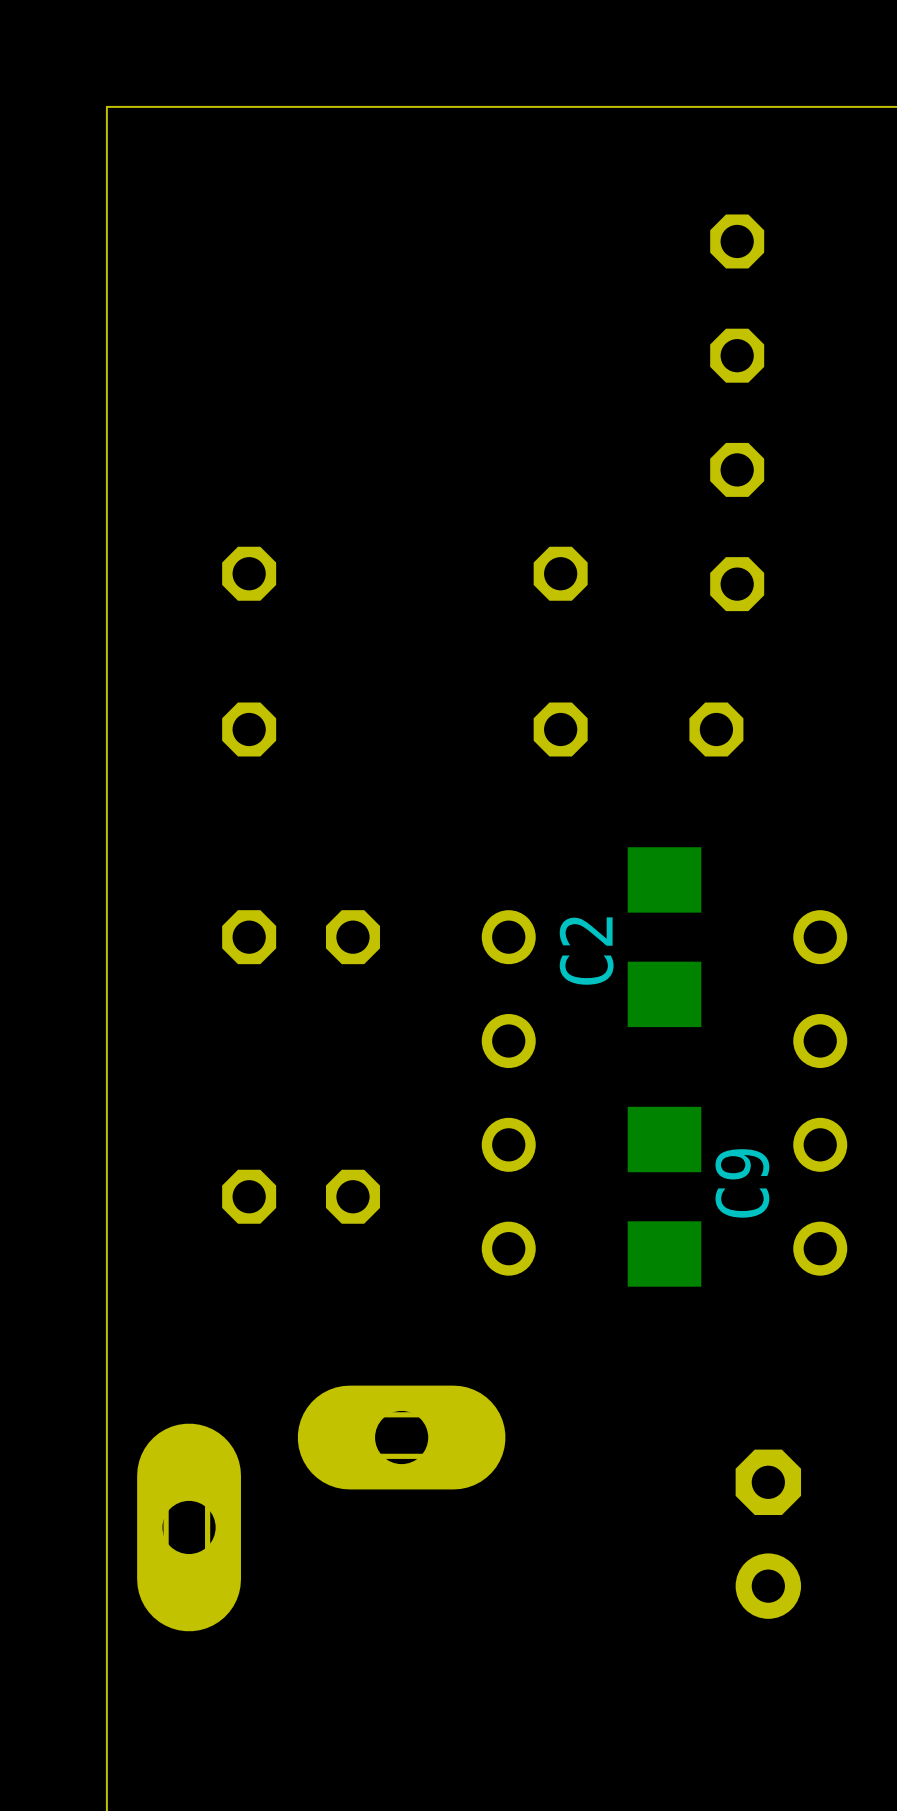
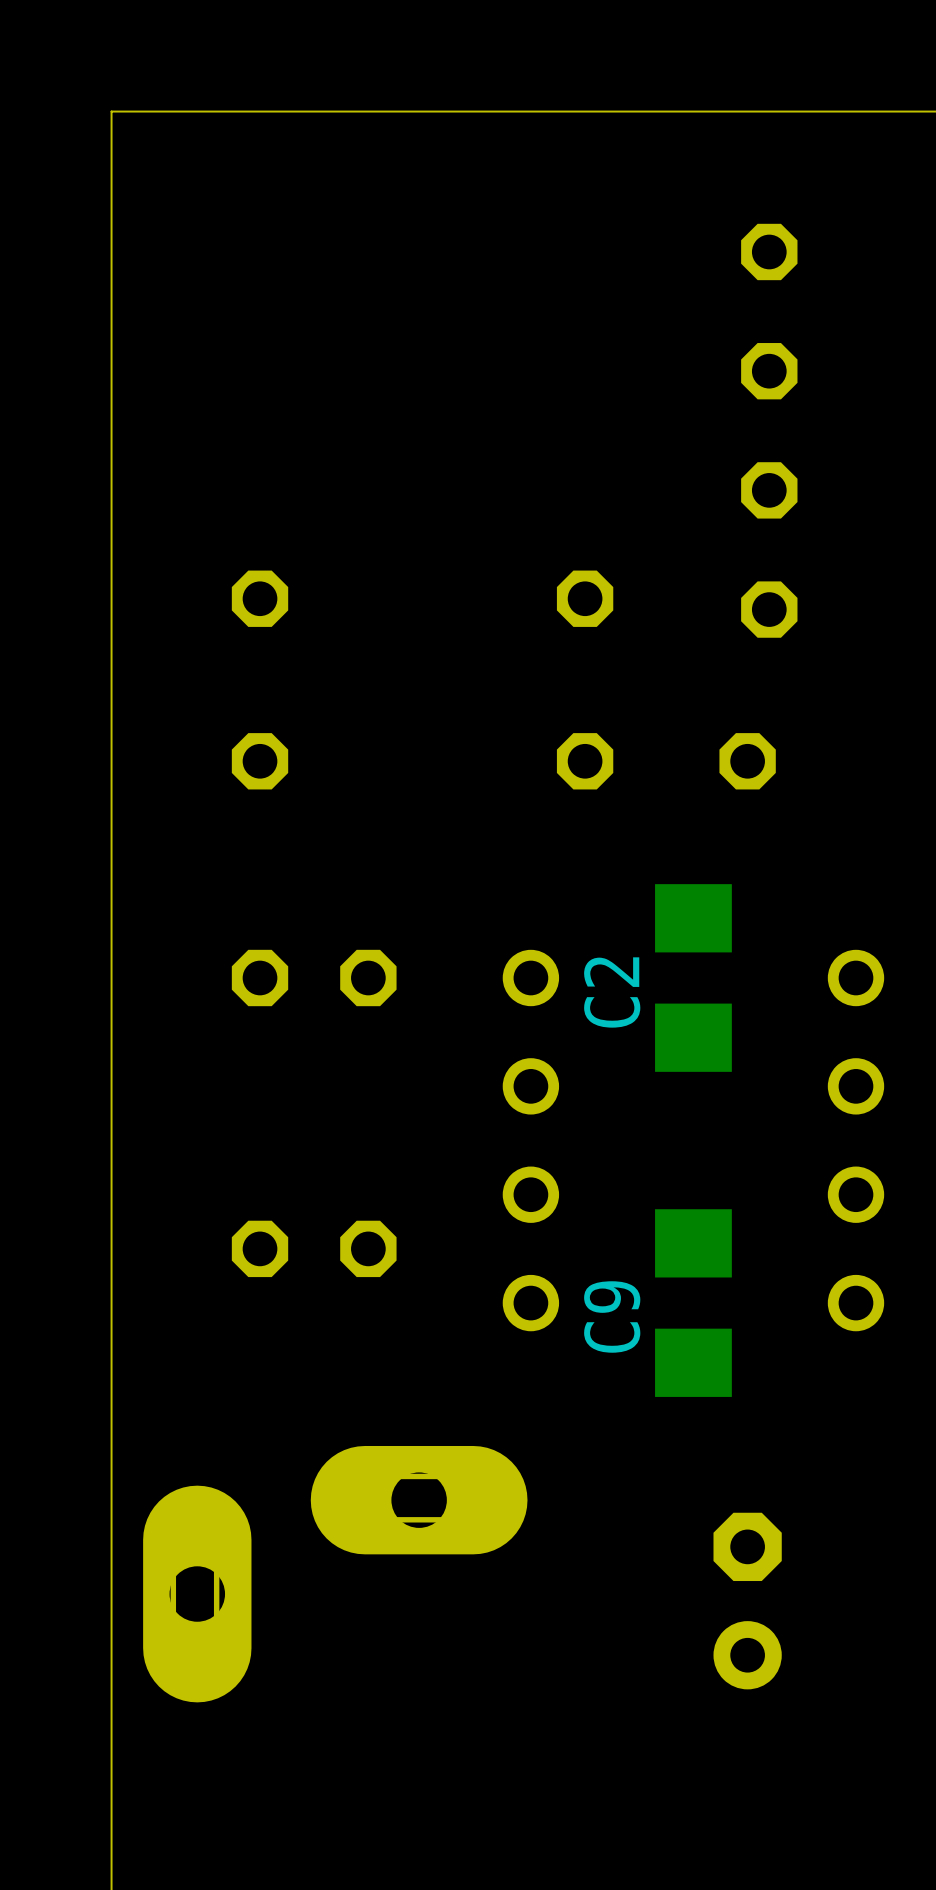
C9 name position: C9 (742, 1183) -> C9 (612, 1316)
C9 position: (664, 1196) -> (693, 1303)
part position: (768, 1534) -> (747, 1601)

